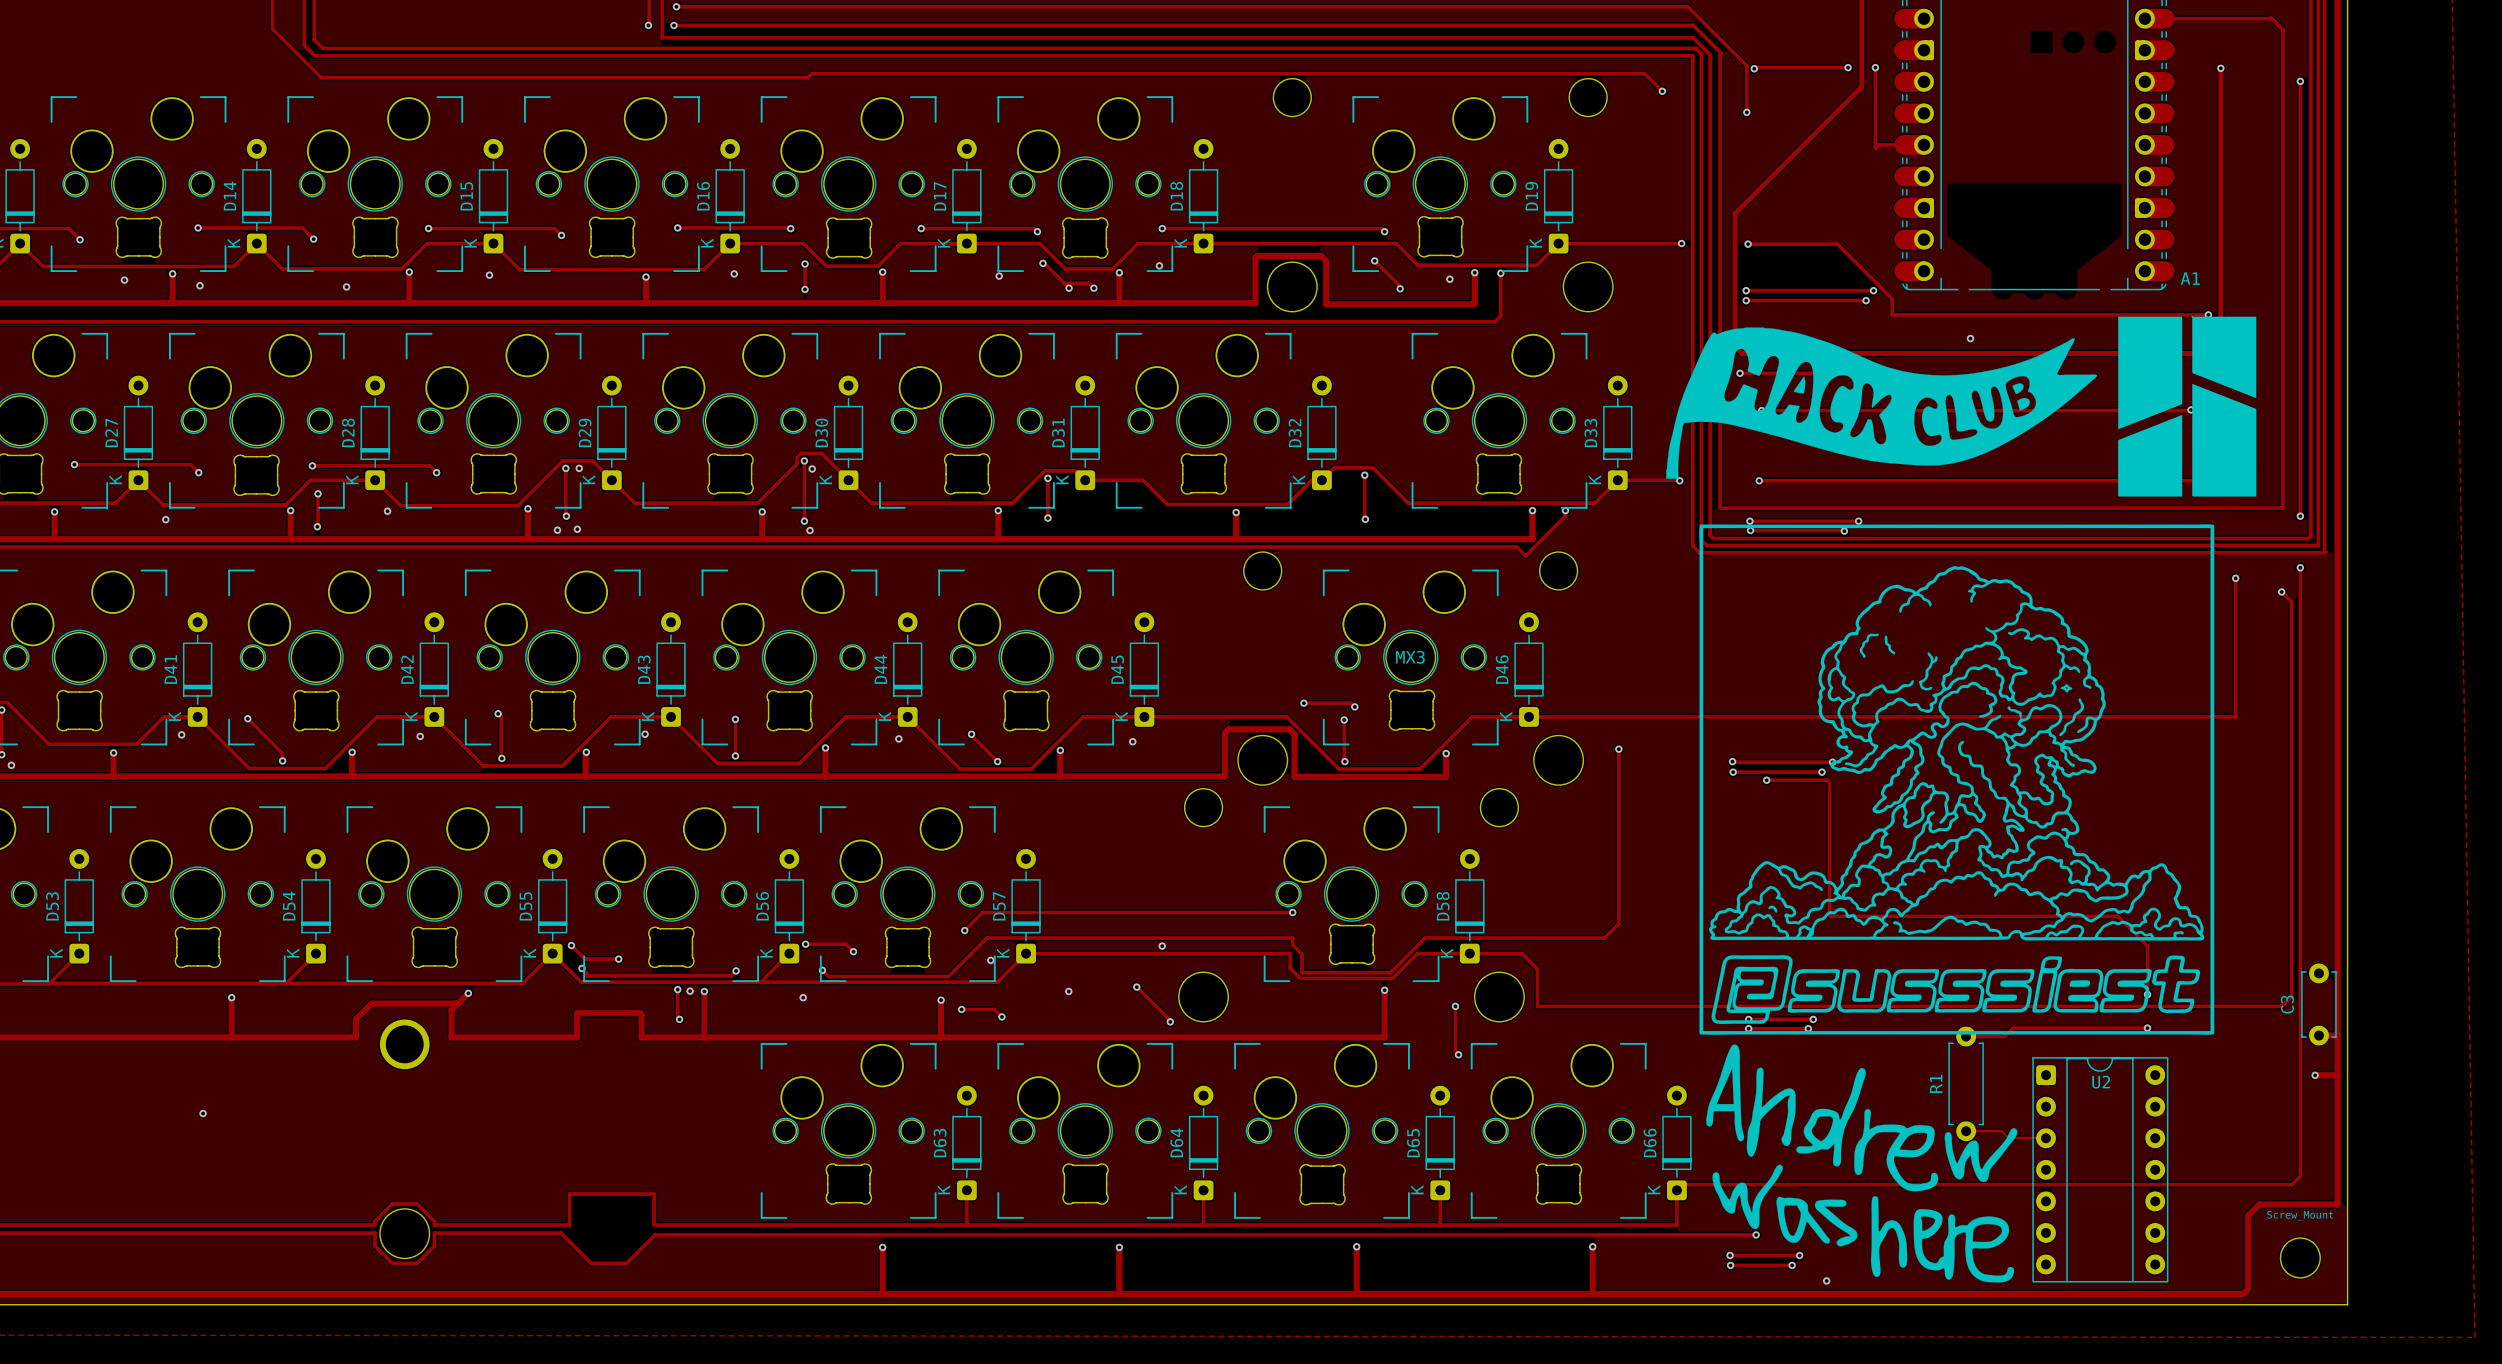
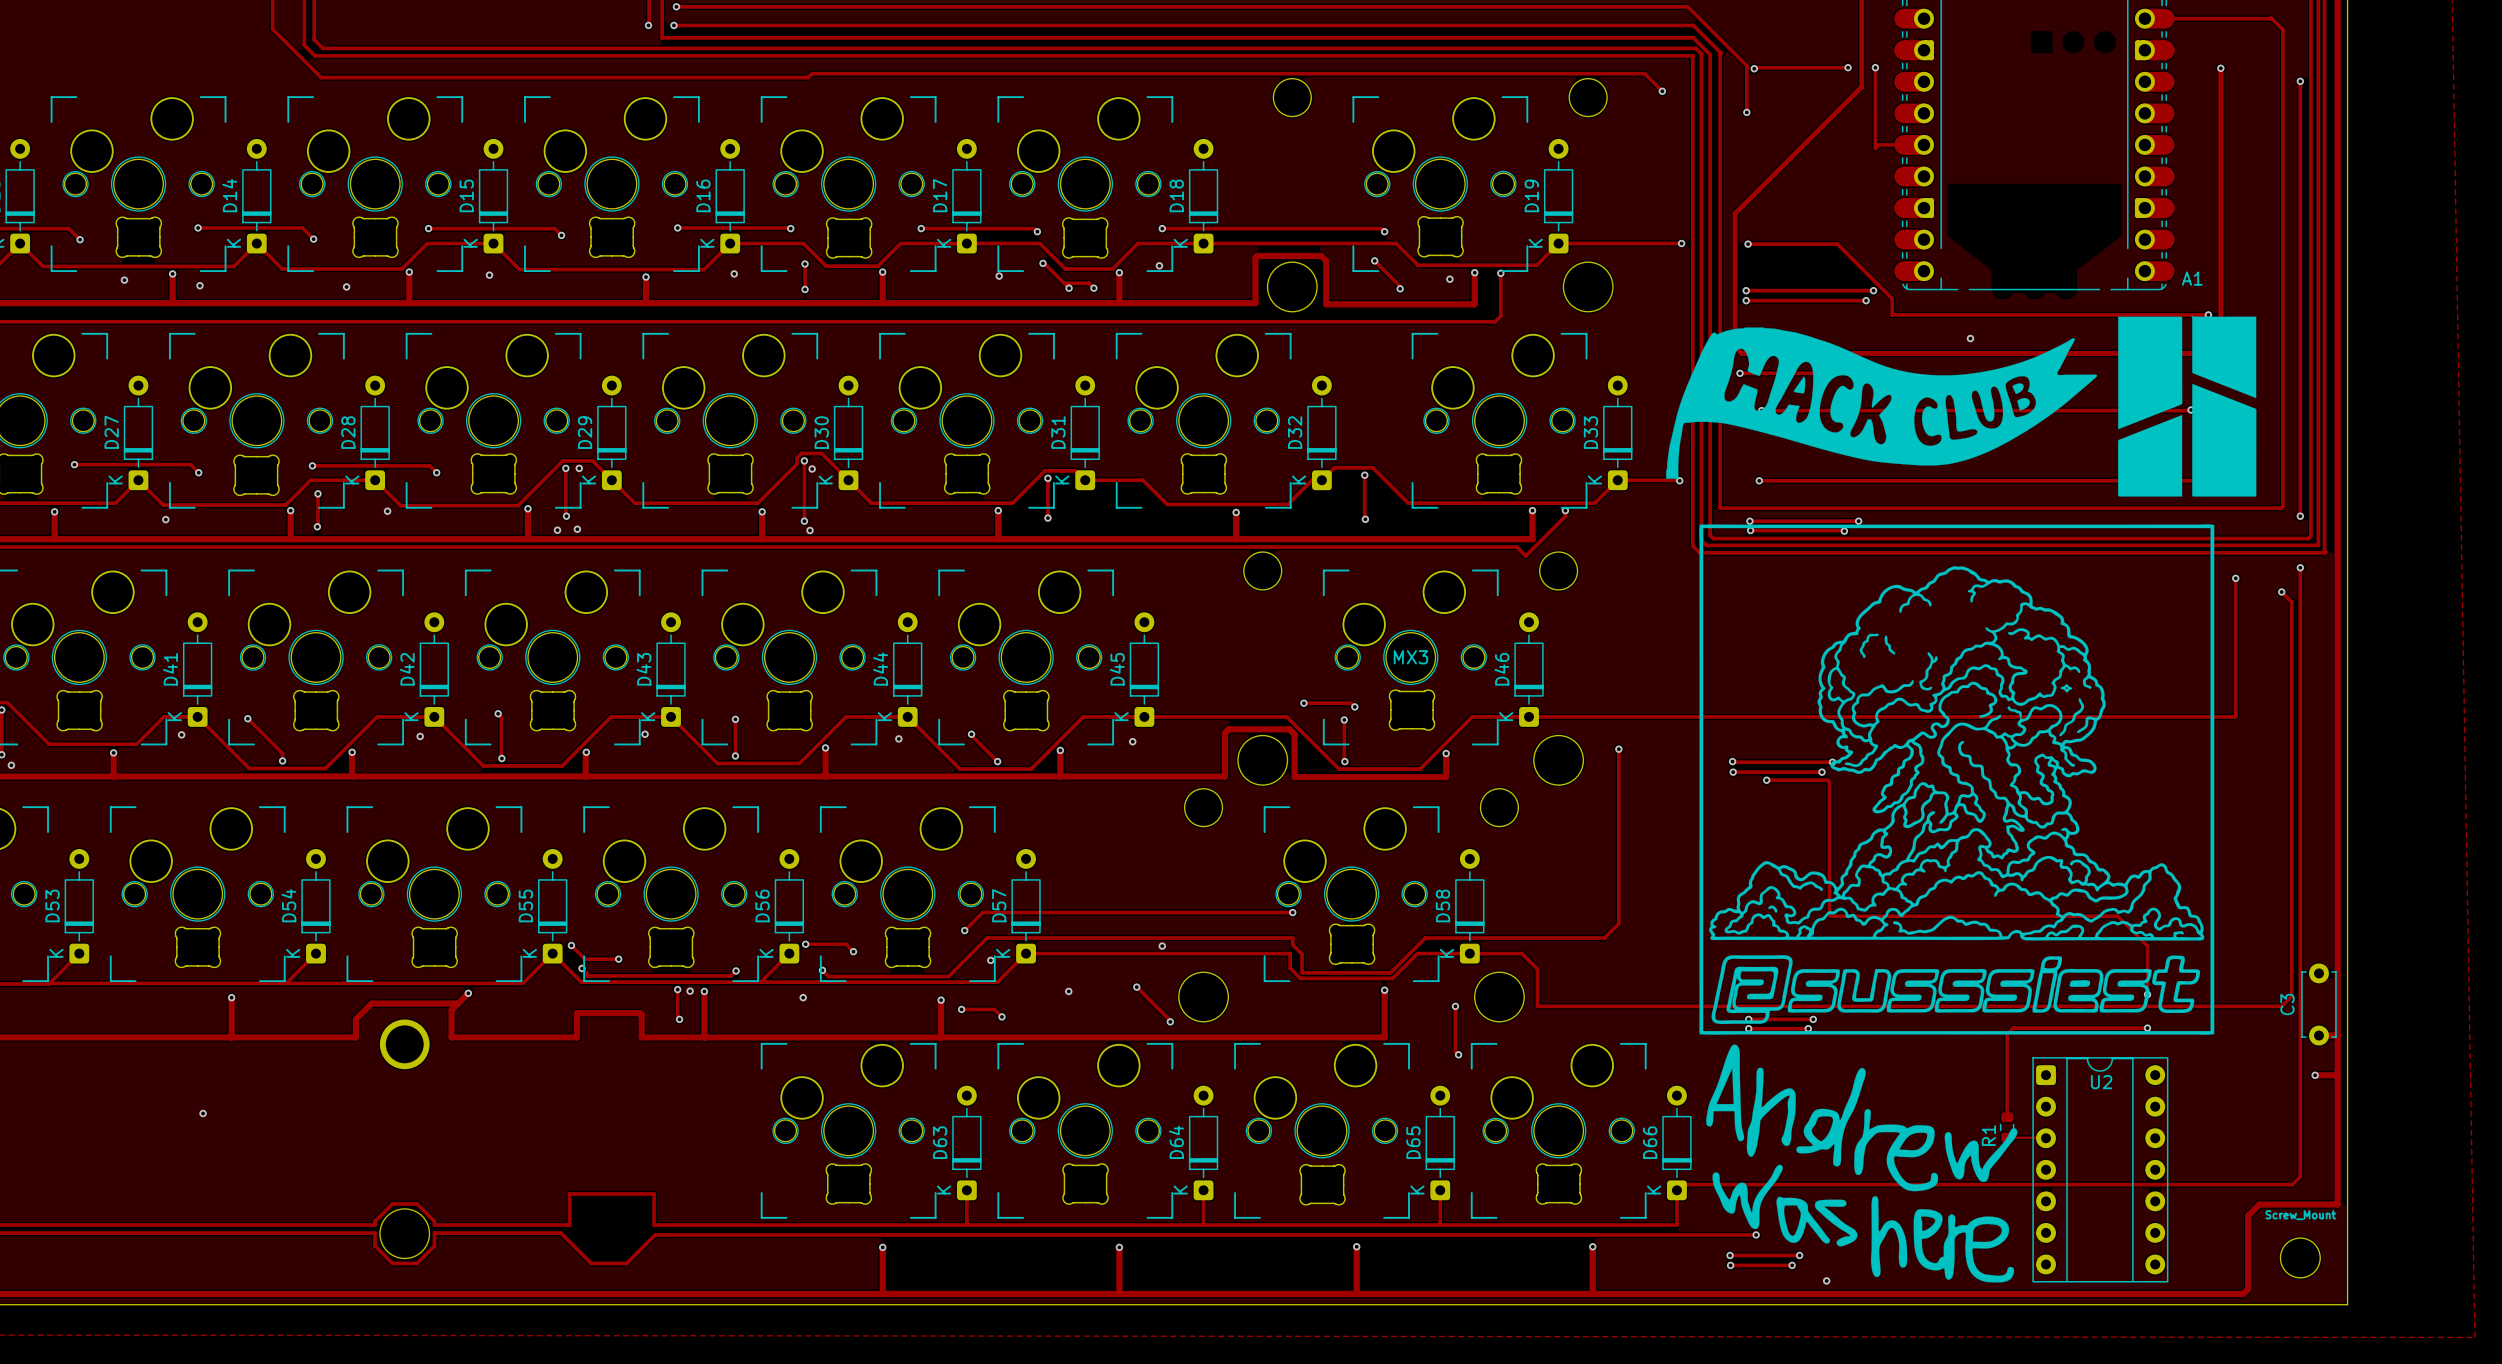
R1 footprint: [1948, 1026, 1984, 1142] -> [1999, 1112, 2015, 1143]
track: (2007, 1034) (2004, 1036) (1966, 1036) -> (2007, 1034) (2007, 1119)
track: (1966, 1131) (2001, 1131) (2008, 1137) -> none

